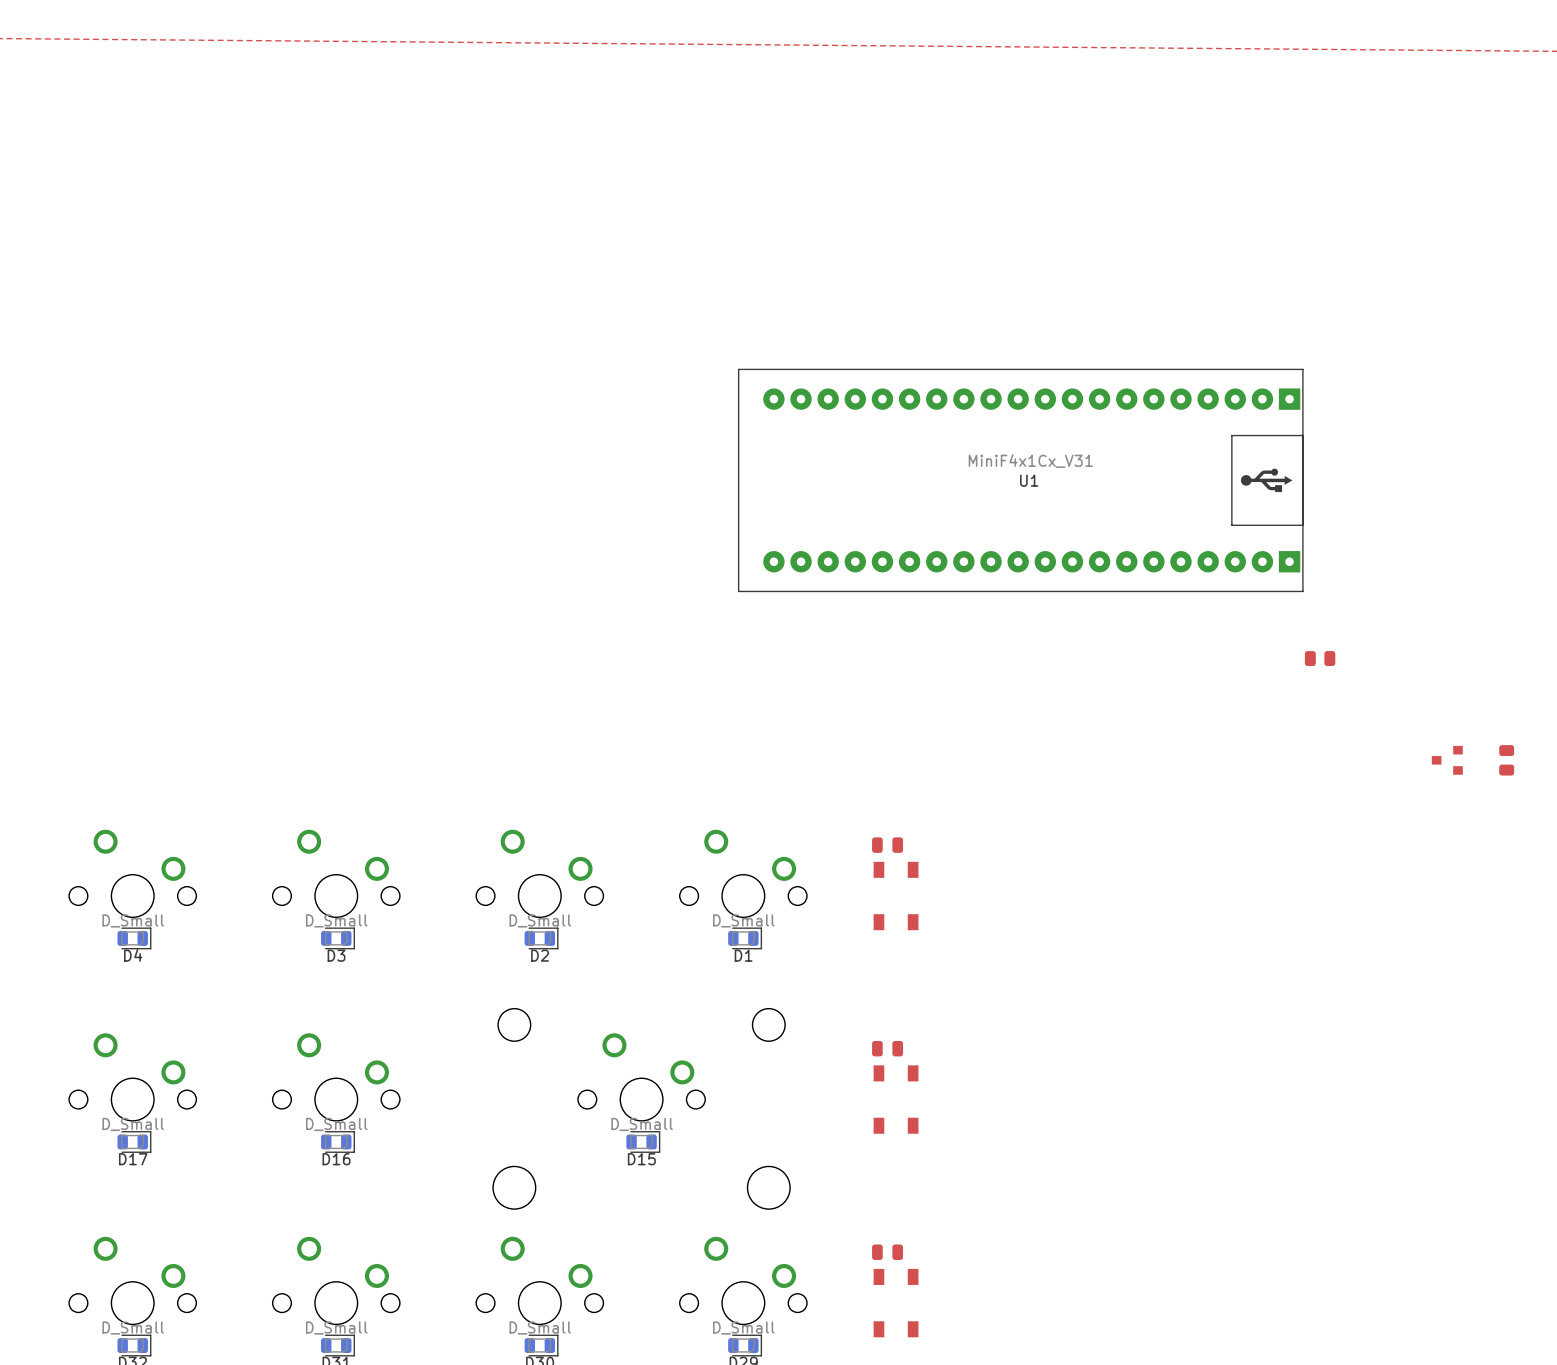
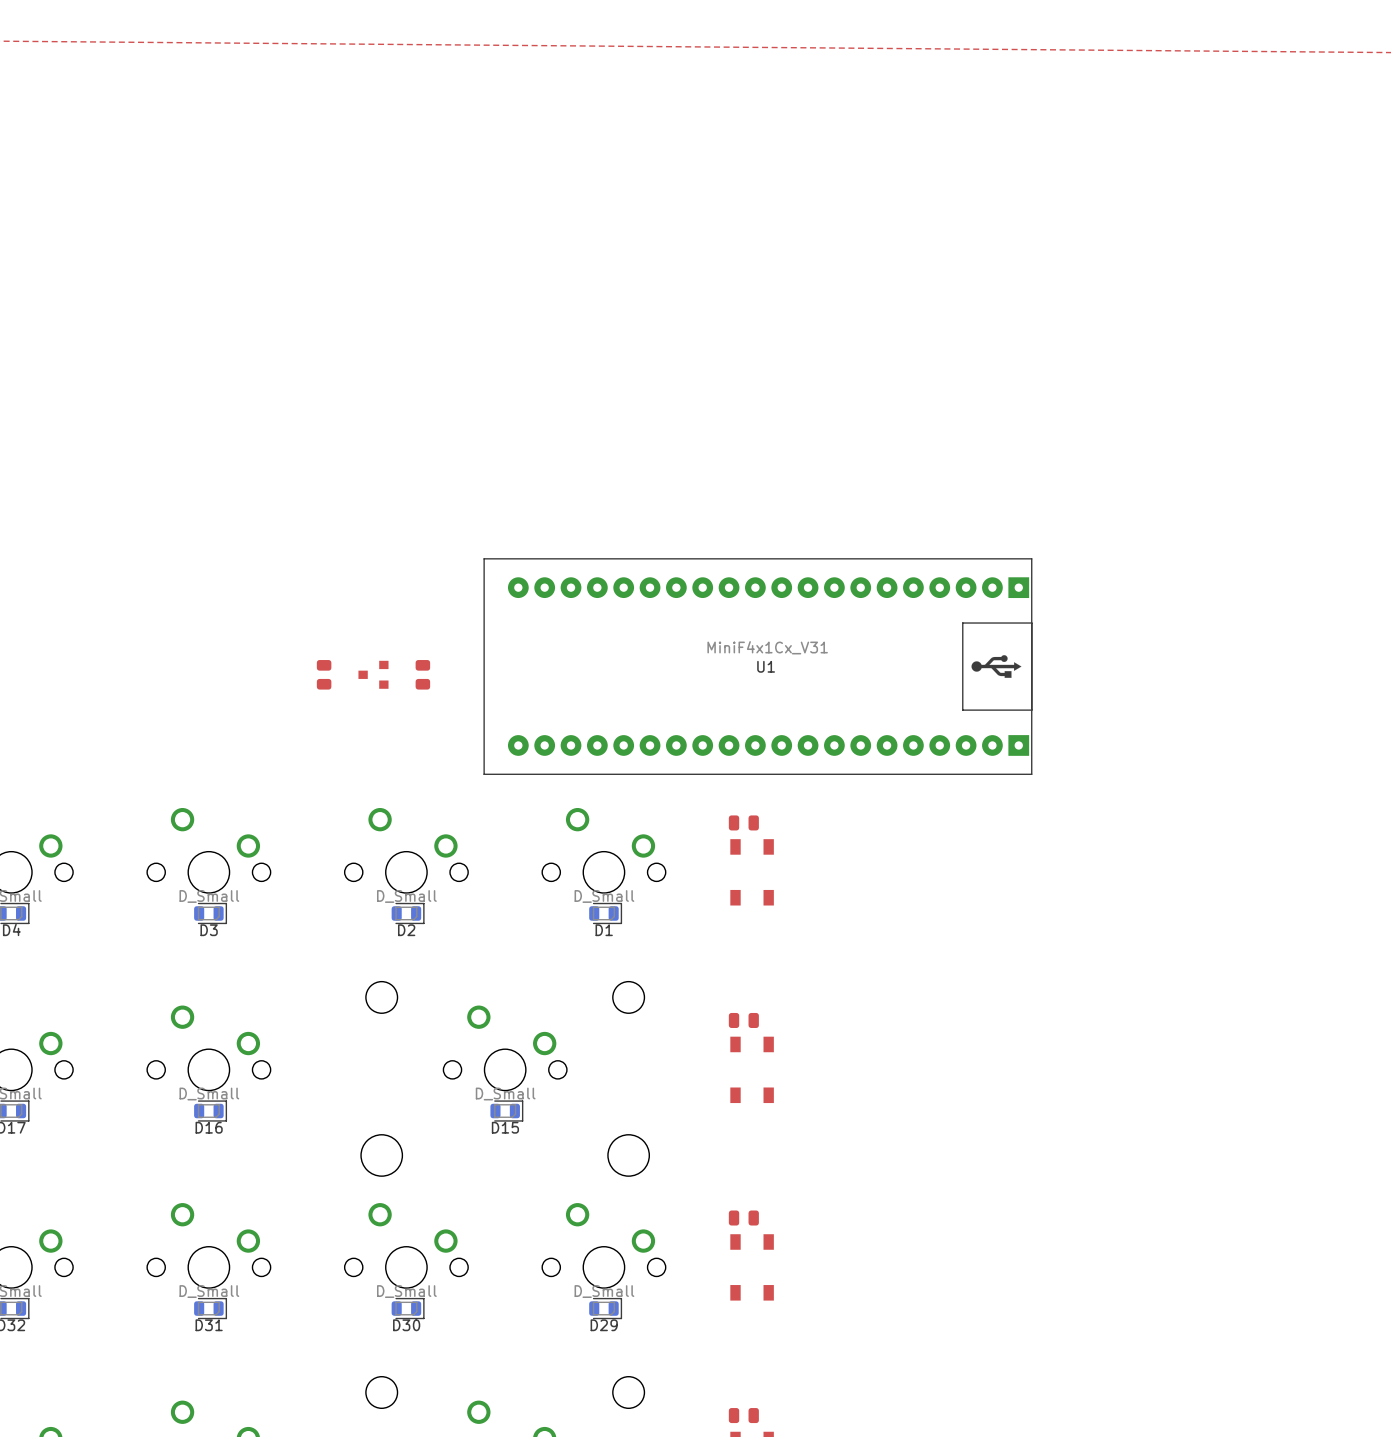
U1 position: (1020, 480) -> (757, 666)
part: (1320, 658) -> none
part: none -> (324, 674)
part: none -> (373, 674)
part: none -> (422, 674)
part: (1447, 760) -> none
part: (1506, 760) -> none

